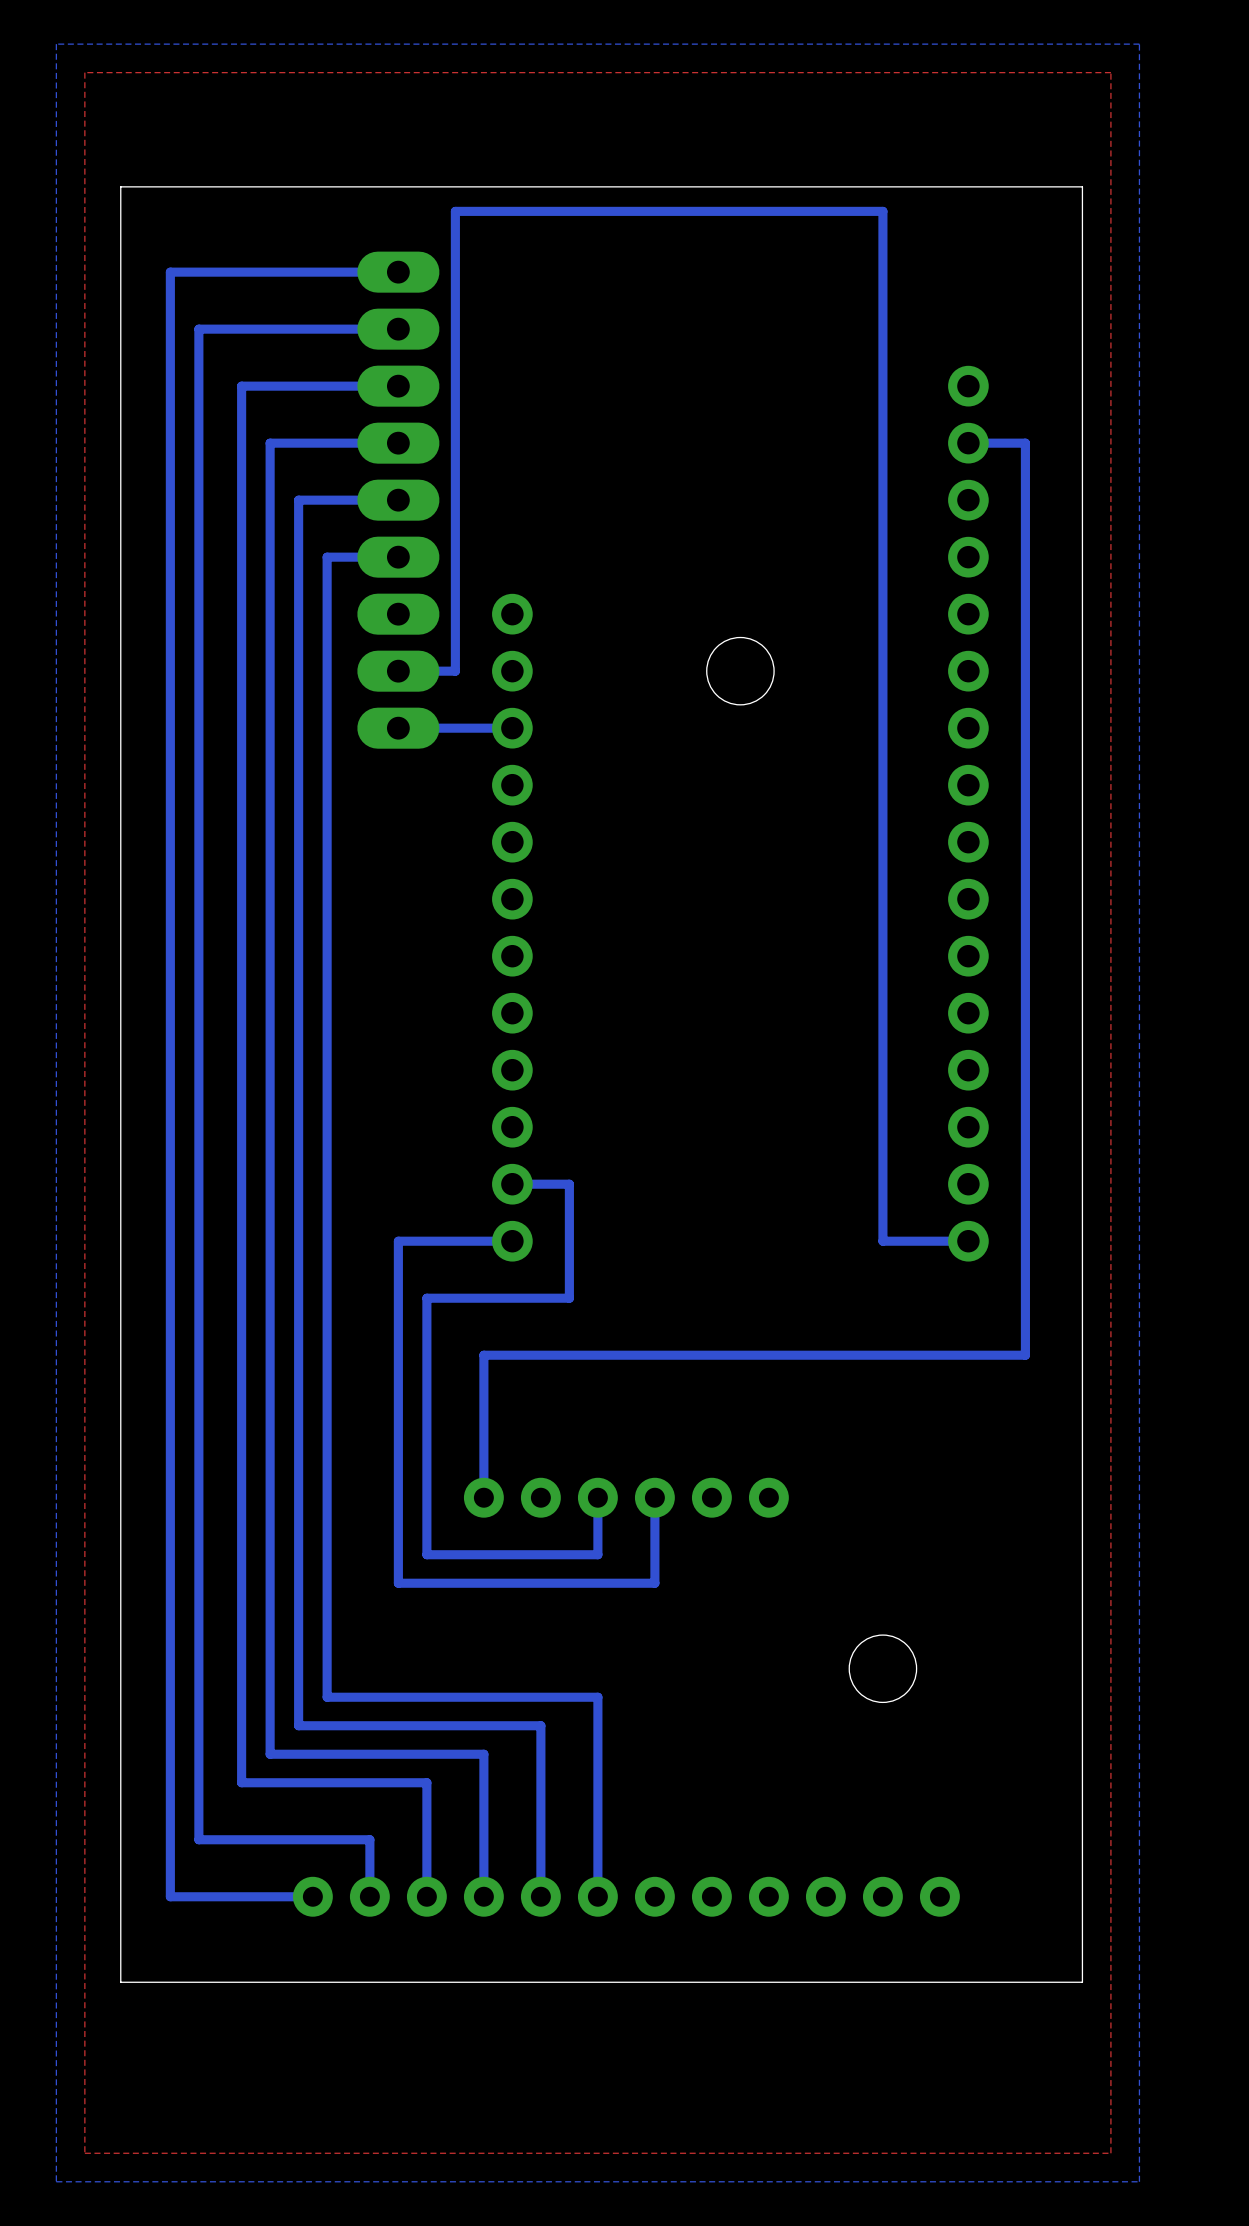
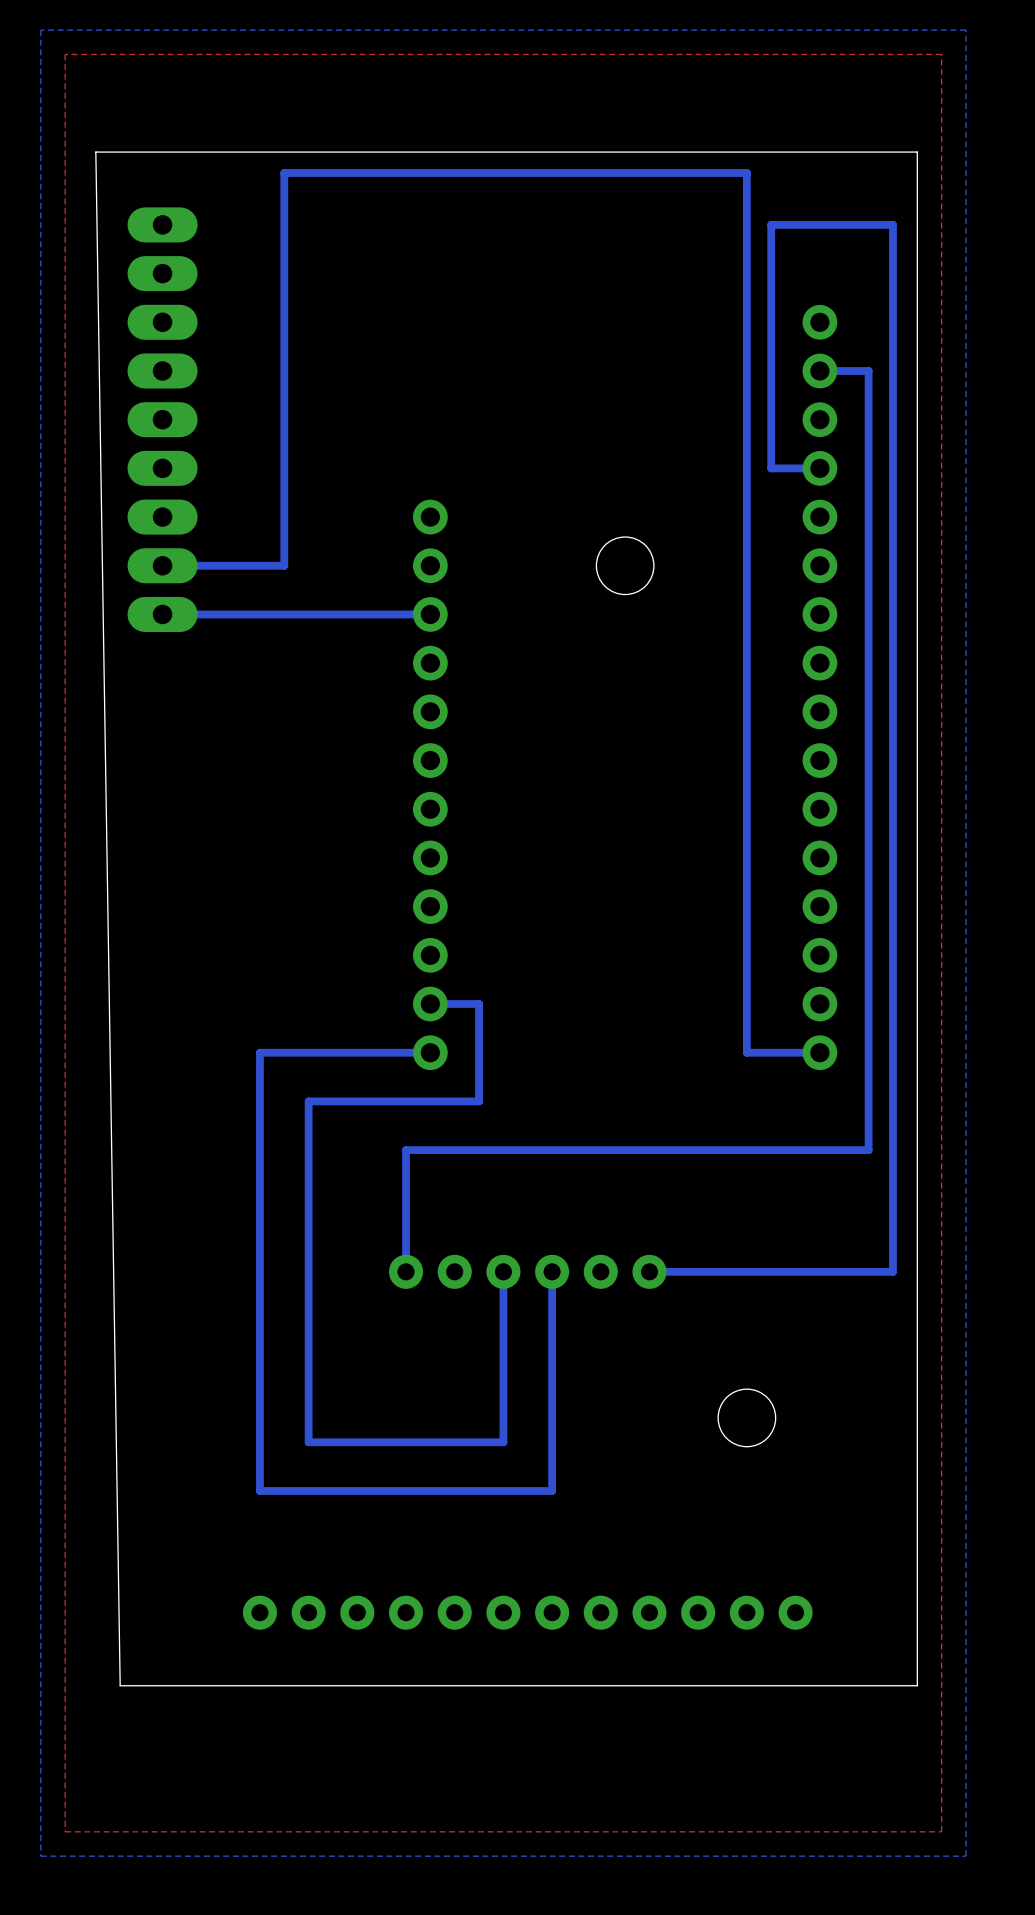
board edge: (120, 186) (120, 1982) (149, 1982) -> (95, 152) (120, 1685)
bottom track: (455, 211) (455, 671) (398, 671) -> (381, 173) (284, 173) (284, 565) (162, 565)
bottom track: (398, 272) (170, 272) (170, 1896) (312, 1896) -> none
bottom track: (398, 329) (198, 329) (198, 1839) (369, 1839) (369, 1896) -> none
bottom track: (398, 386) (241, 386) (241, 1782) (426, 1782) (426, 1896) -> none
bottom track: (398, 443) (270, 443) (270, 1754) (312, 1754) -> none
bottom track: (398, 500) (298, 500) (298, 1725) (540, 1725) (540, 1896) -> none
part position: (398, 500) -> (162, 419)
bottom track: (398, 557) (327, 557) (327, 1697) (369, 1697) -> none
bottom track: none -> (819, 468) (771, 468) (771, 224) (892, 224) (892, 1271) (649, 1271)
bottom track: none -> (332, 614) (162, 614)
bottom track: (398, 1241) (398, 1583) (654, 1583) -> (332, 1052) (259, 1052) (259, 1490)
bottom track: (426, 1298) (426, 1554) (597, 1554) -> (357, 1101) (308, 1101) (308, 1442)
bottom track: (597, 1697) (597, 1896) -> (503, 1442) (503, 1320)
bottom track: (483, 1754) (483, 1896) -> (406, 1490) (552, 1490) (552, 1344)

